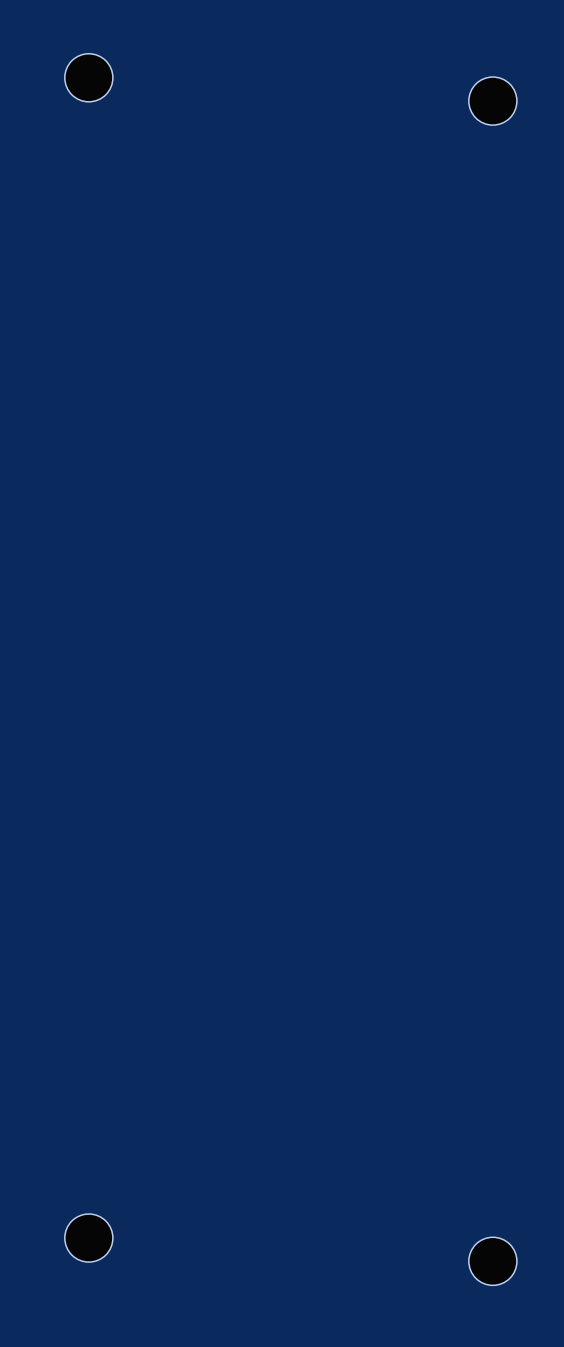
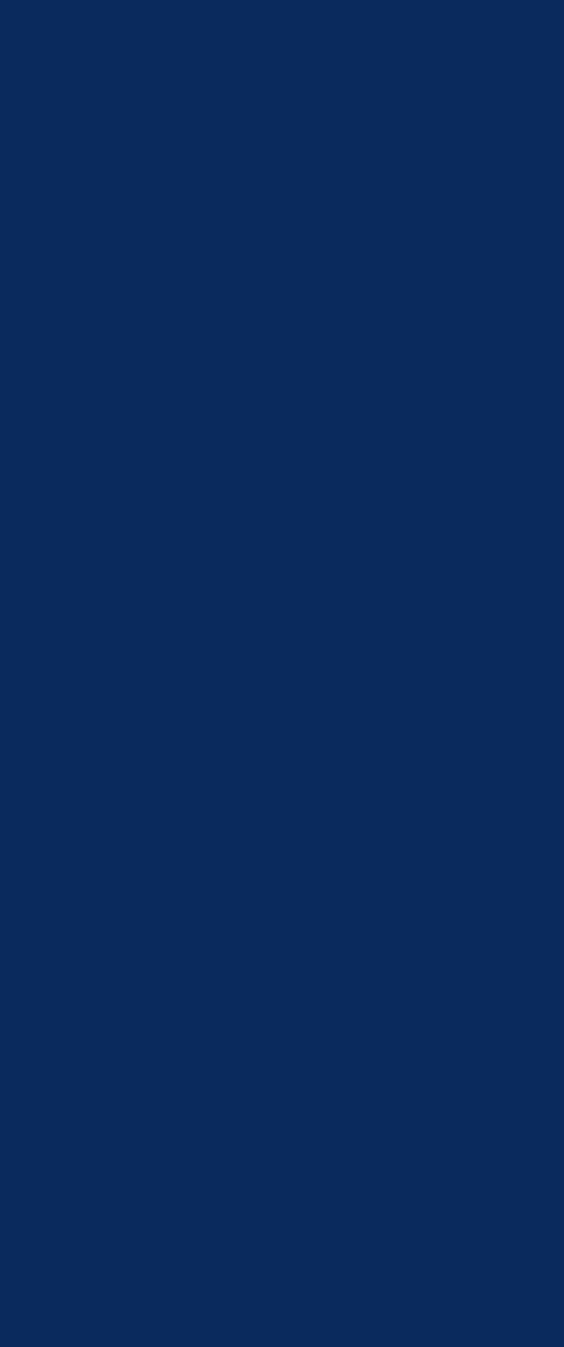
part: (88, 77) -> none
part: (492, 101) -> none
part: (88, 1238) -> none
part: (492, 1261) -> none

